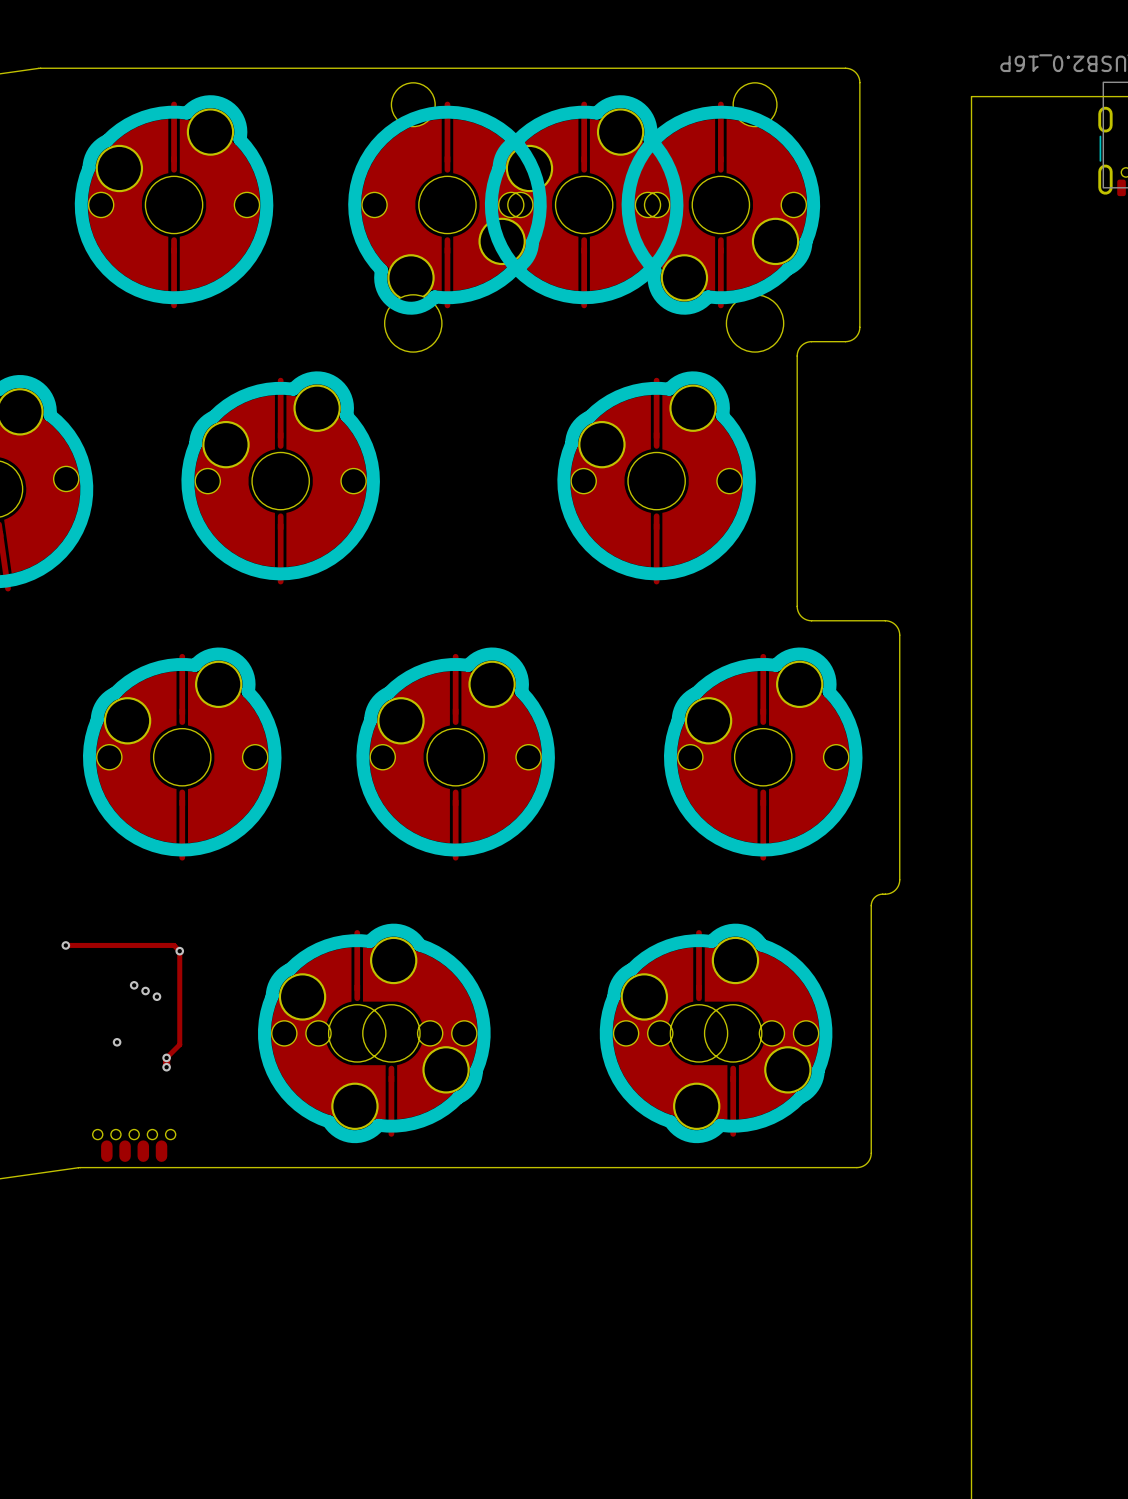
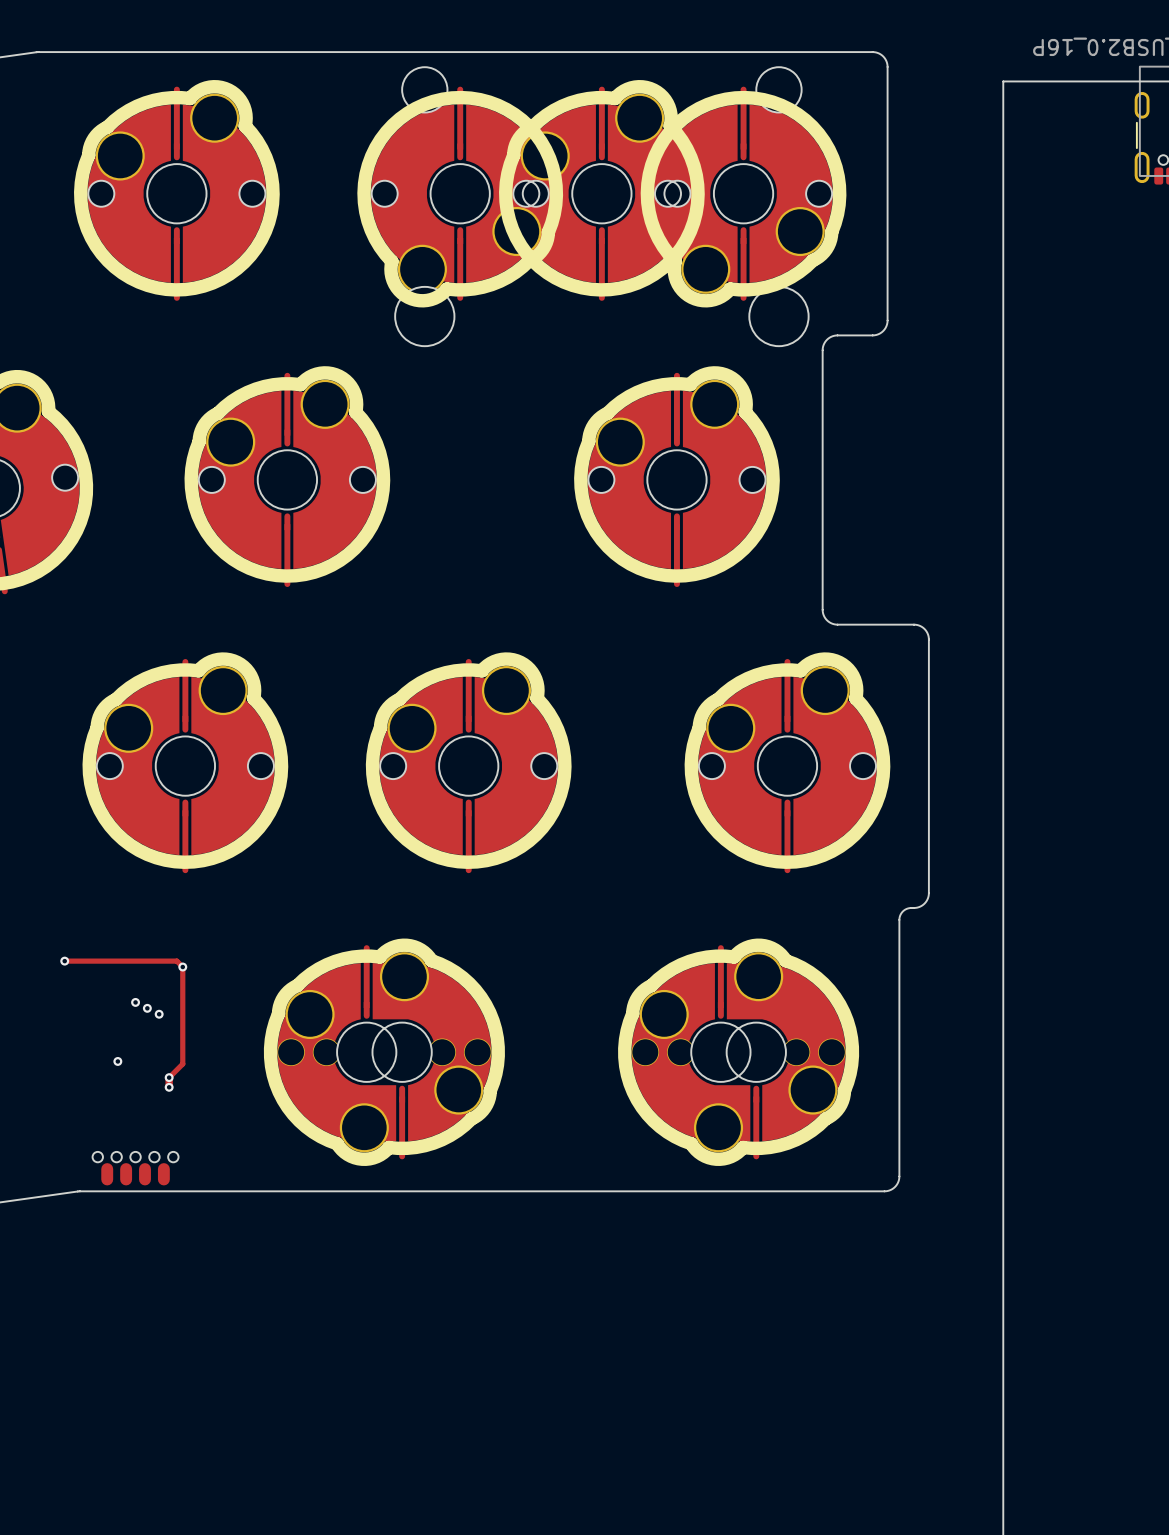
part footprint: [258, 923, 491, 1144] -> [263, 938, 505, 1166]
part footprint: [599, 923, 833, 1144] -> [618, 938, 860, 1166]

